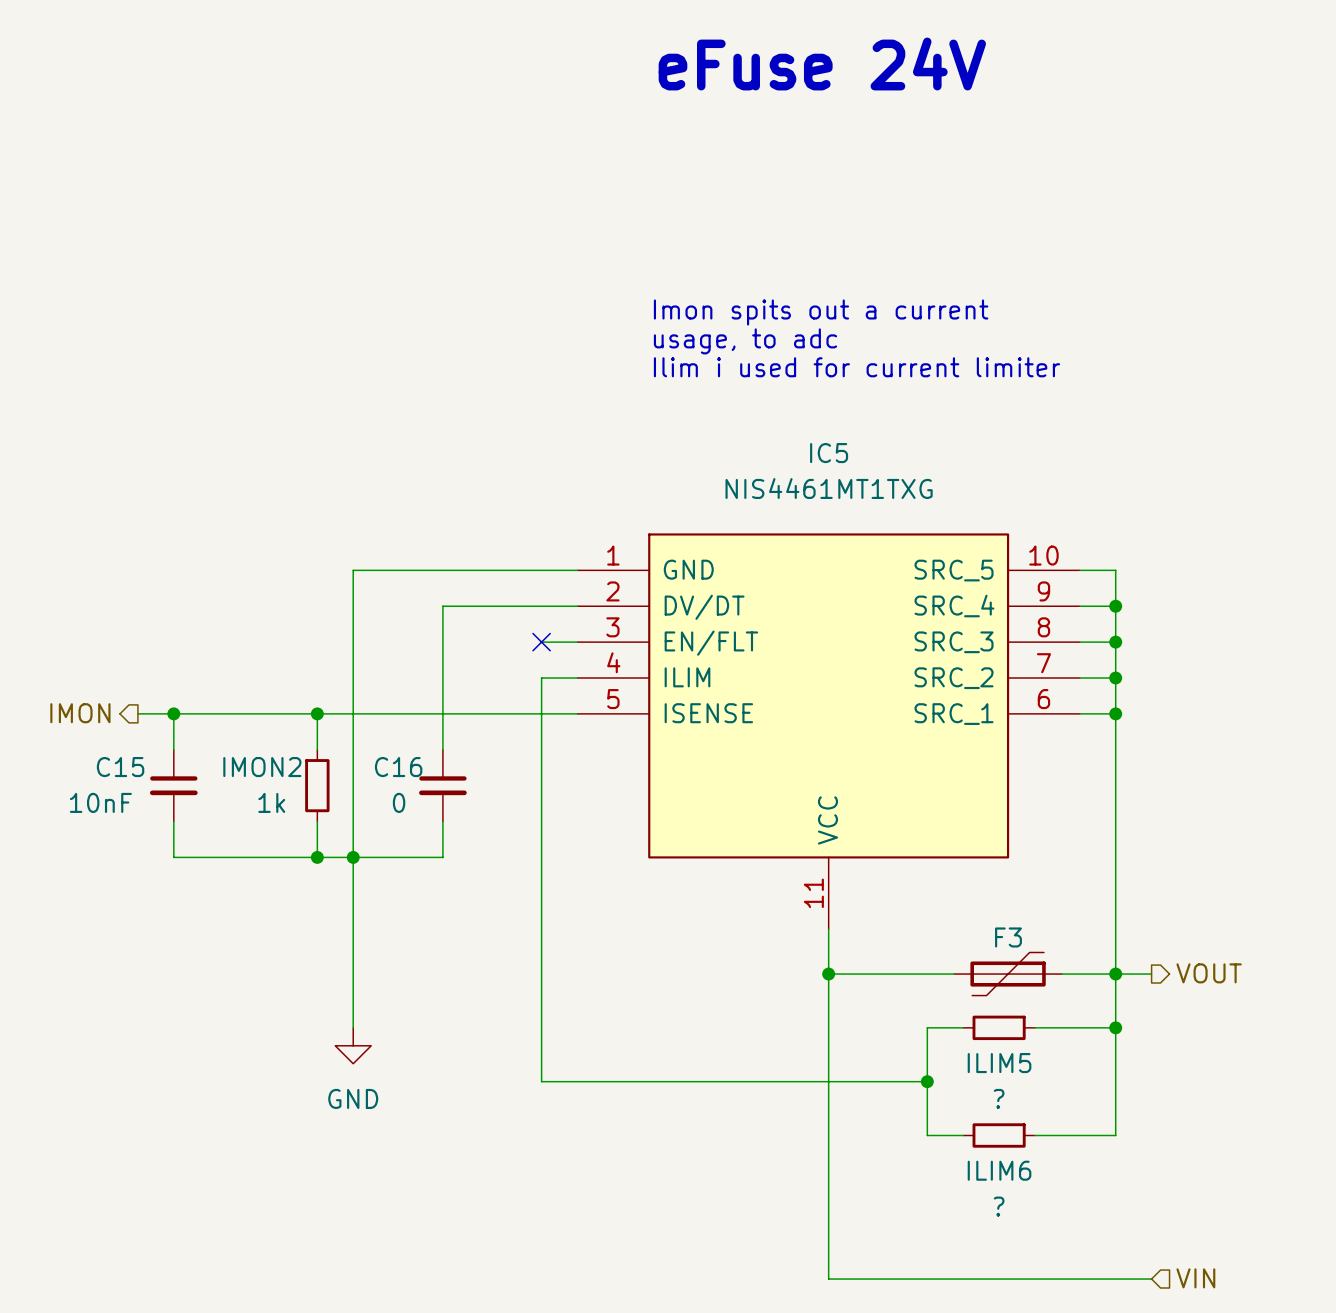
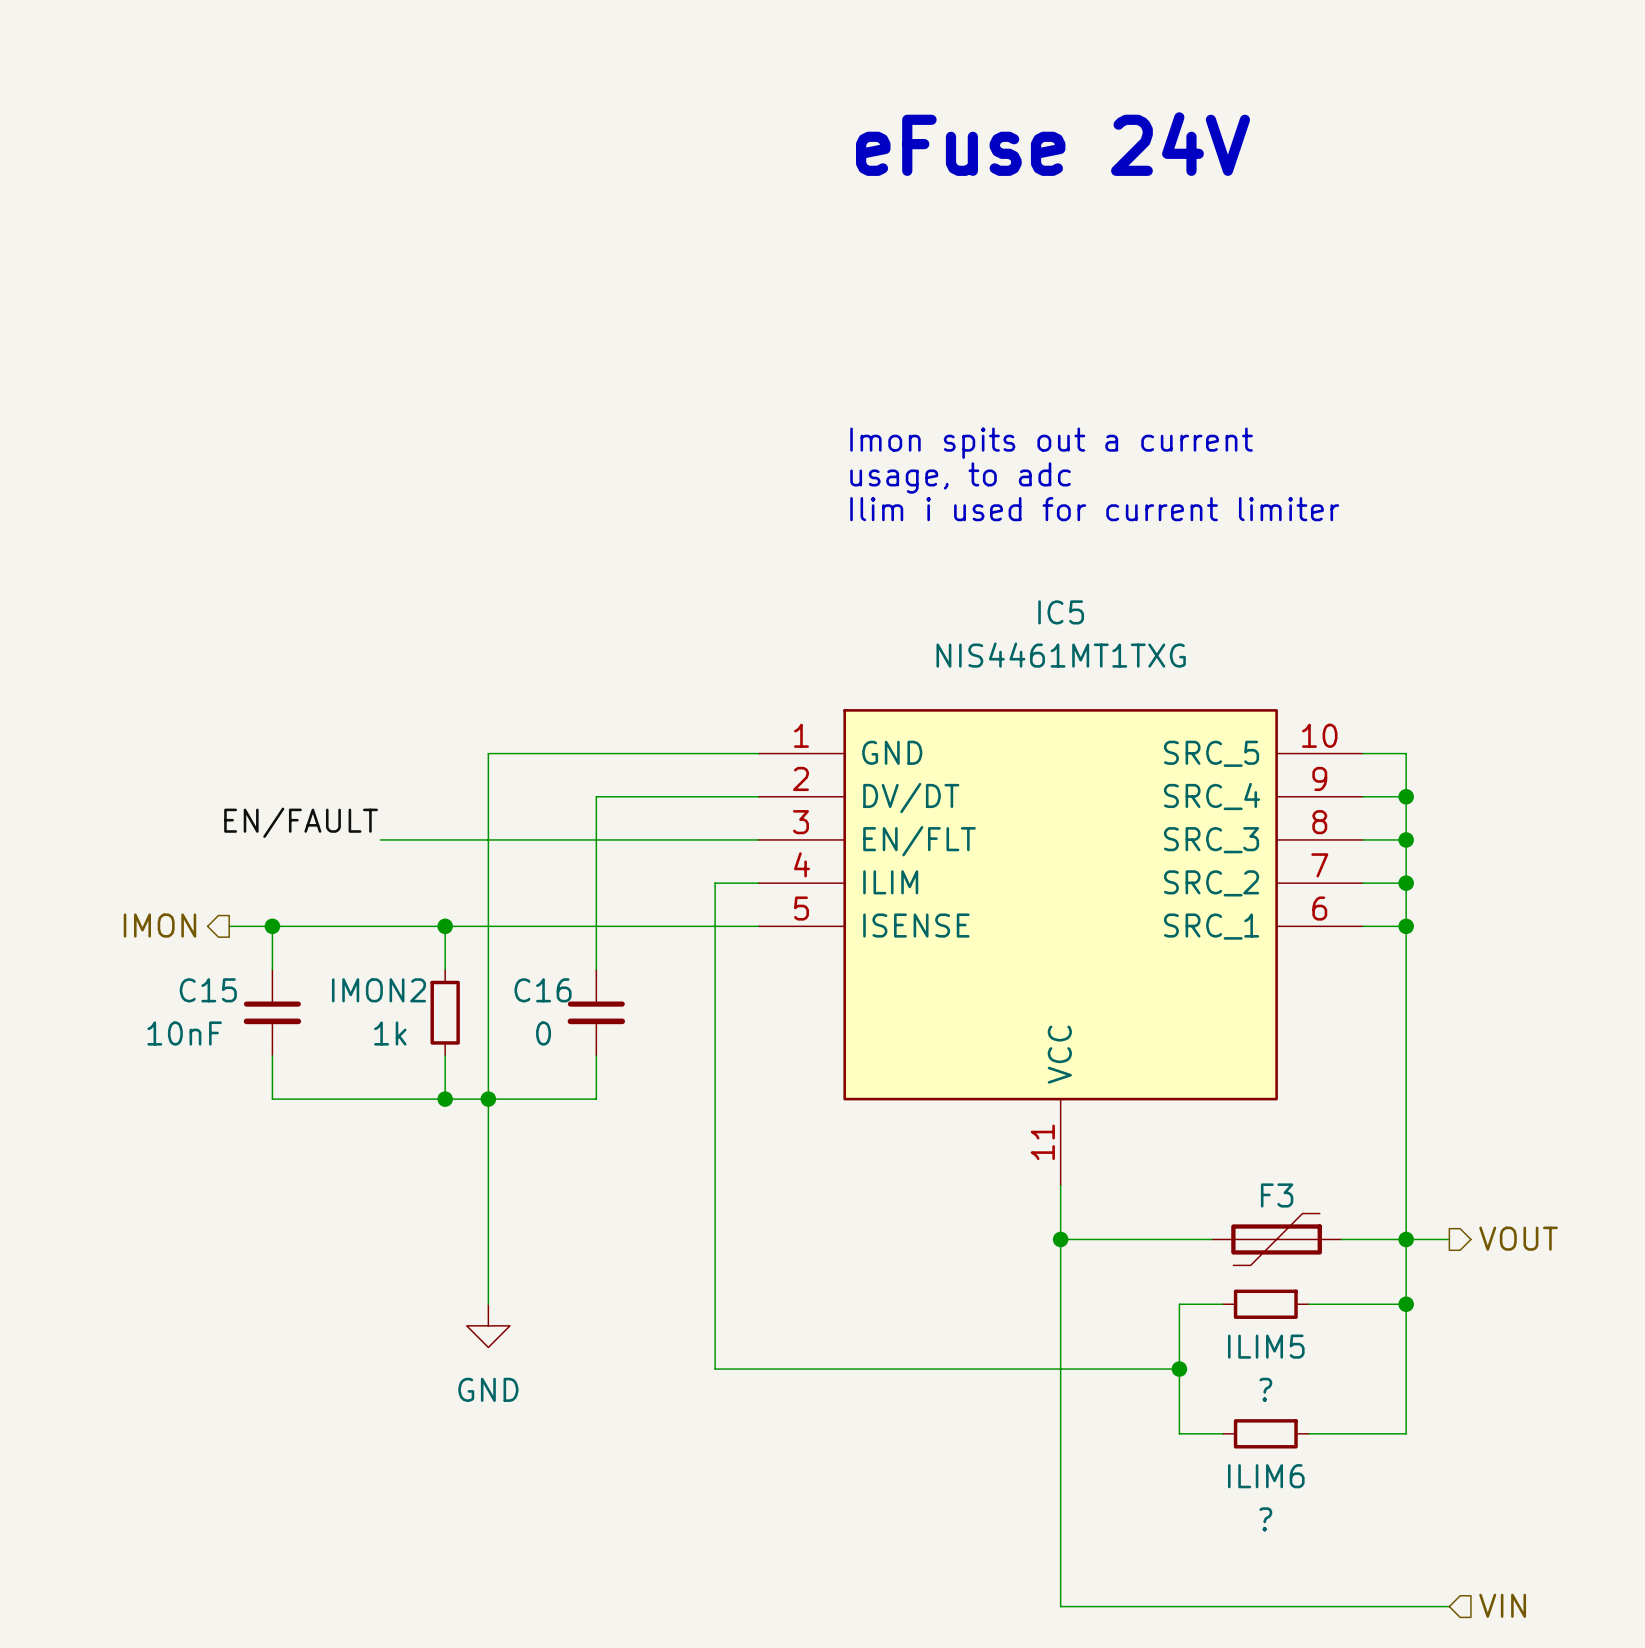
label: none -> EN/FAULT (301, 822)
wire: none -> (380, 839) (715, 839)
no-connect mark: (541, 642) -> none

